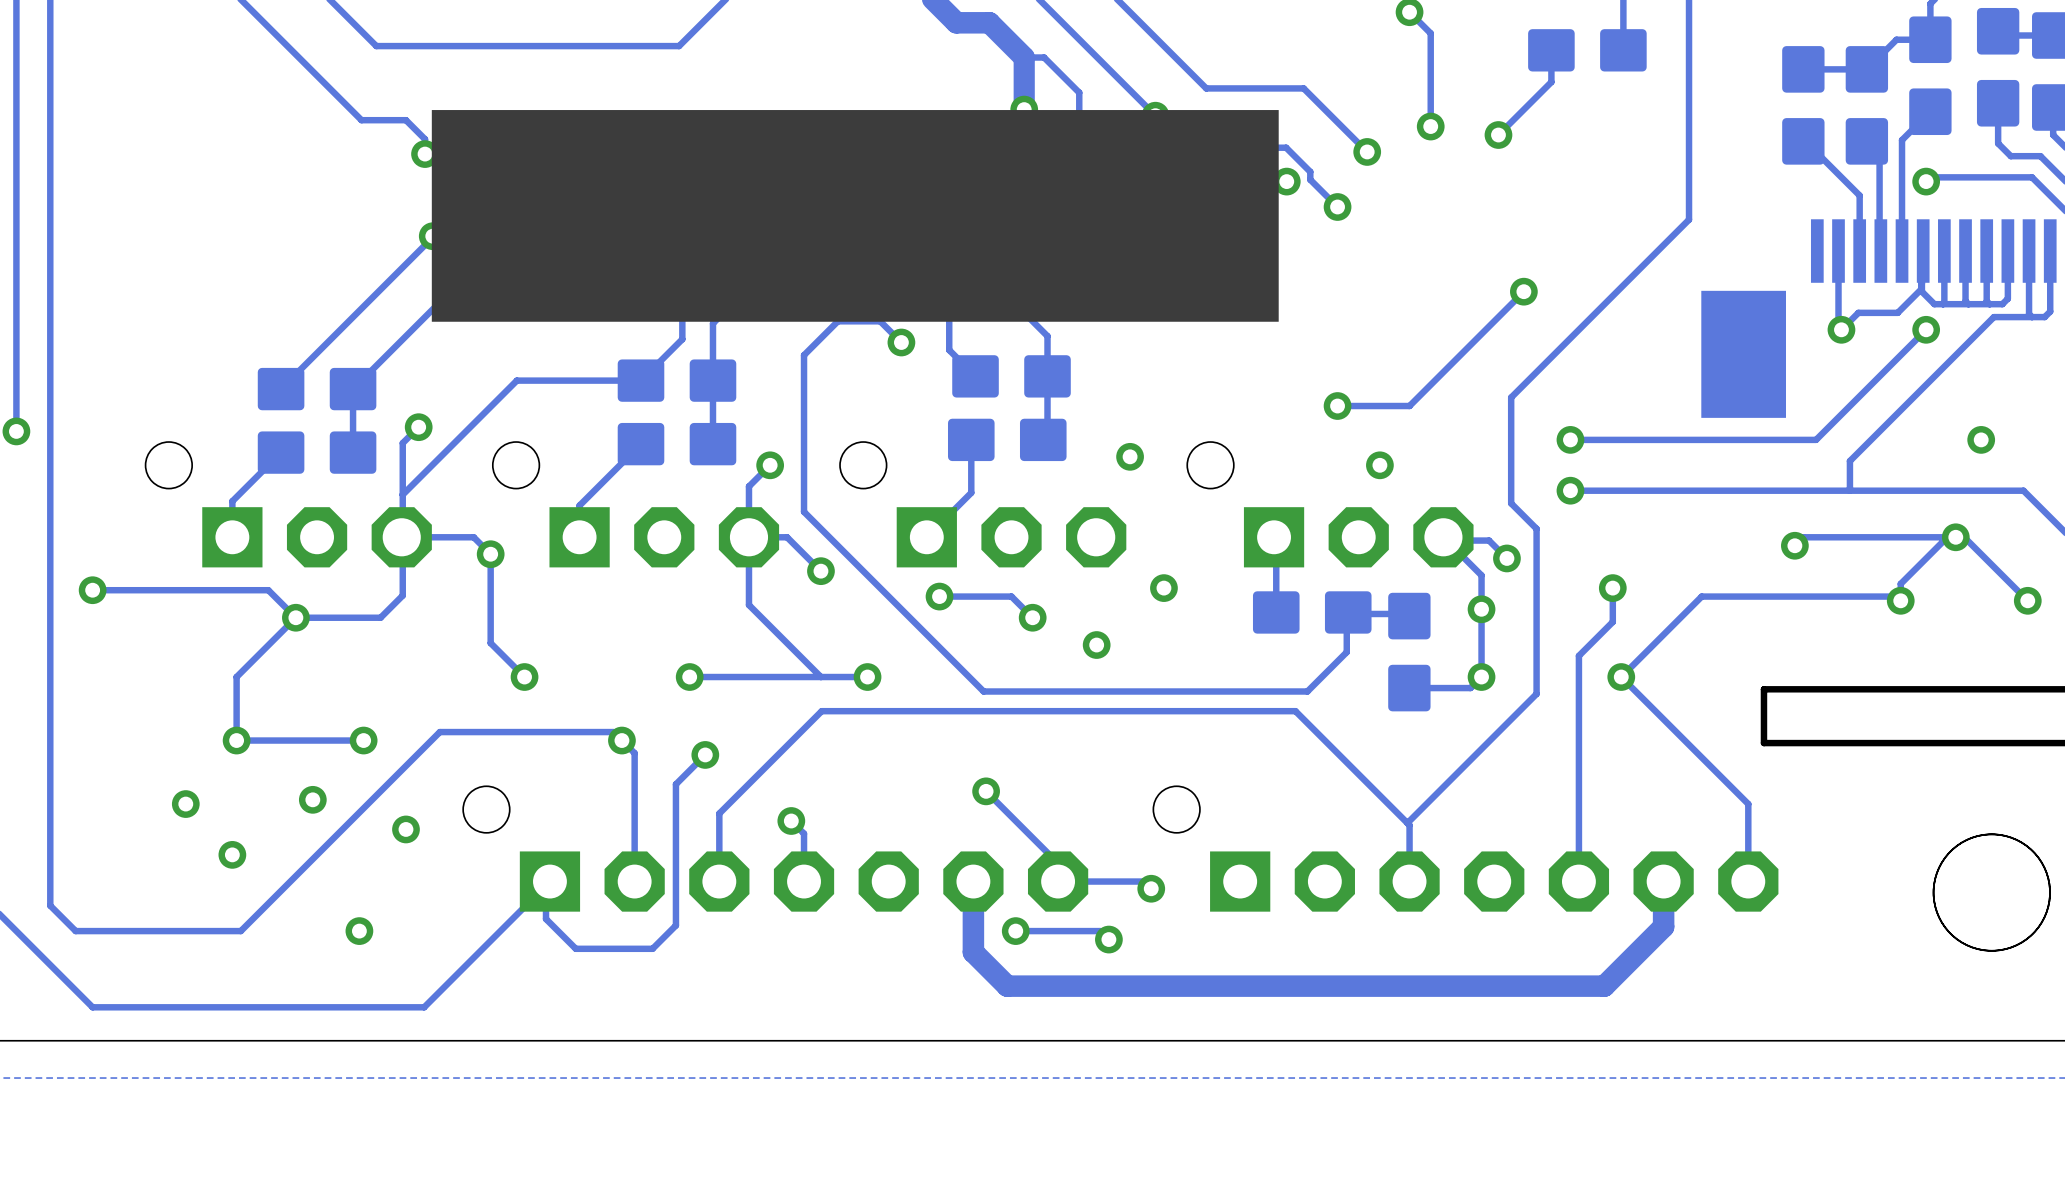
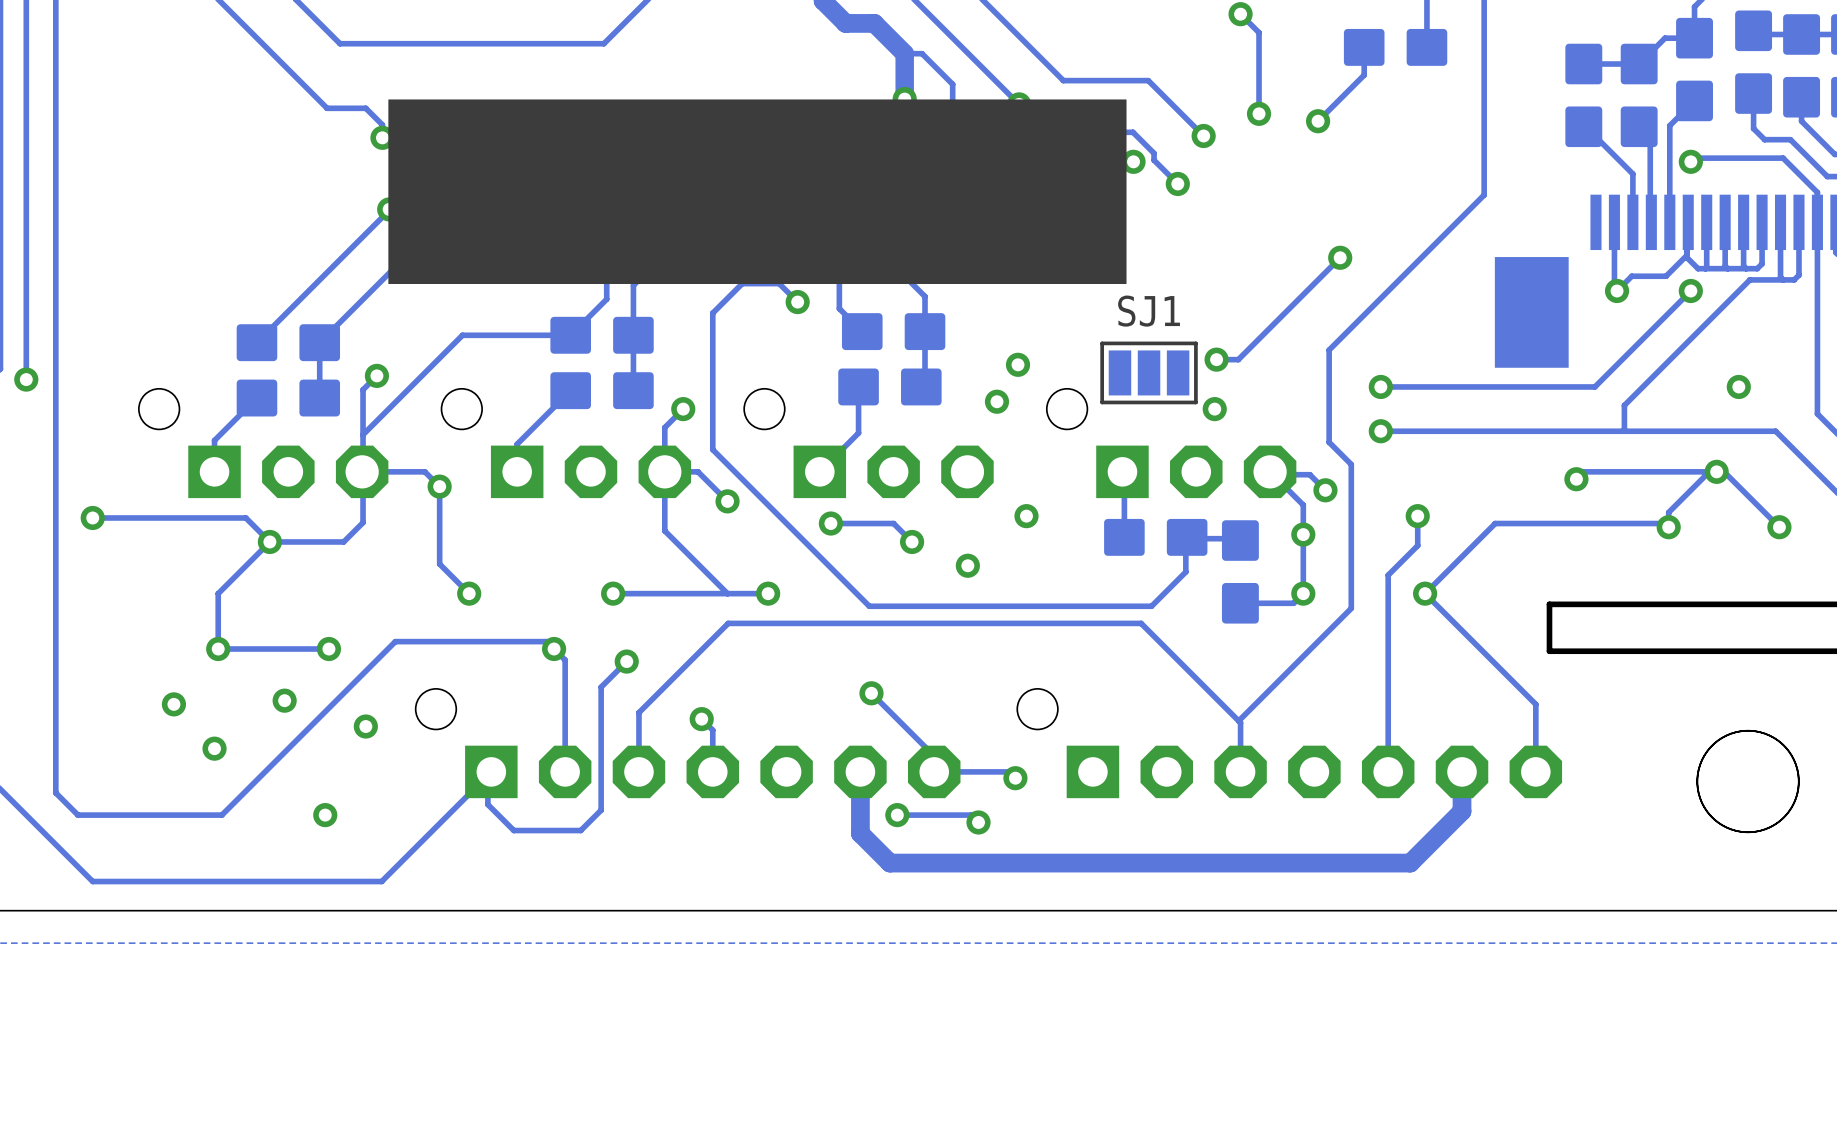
via position: (1337, 406) -> (1216, 359)
track: (1409, 406) (1337, 406) -> (1240, 357) (1238, 359) (1216, 359)
via: none -> (1018, 364)
SJ1: none -> (1149, 372)

